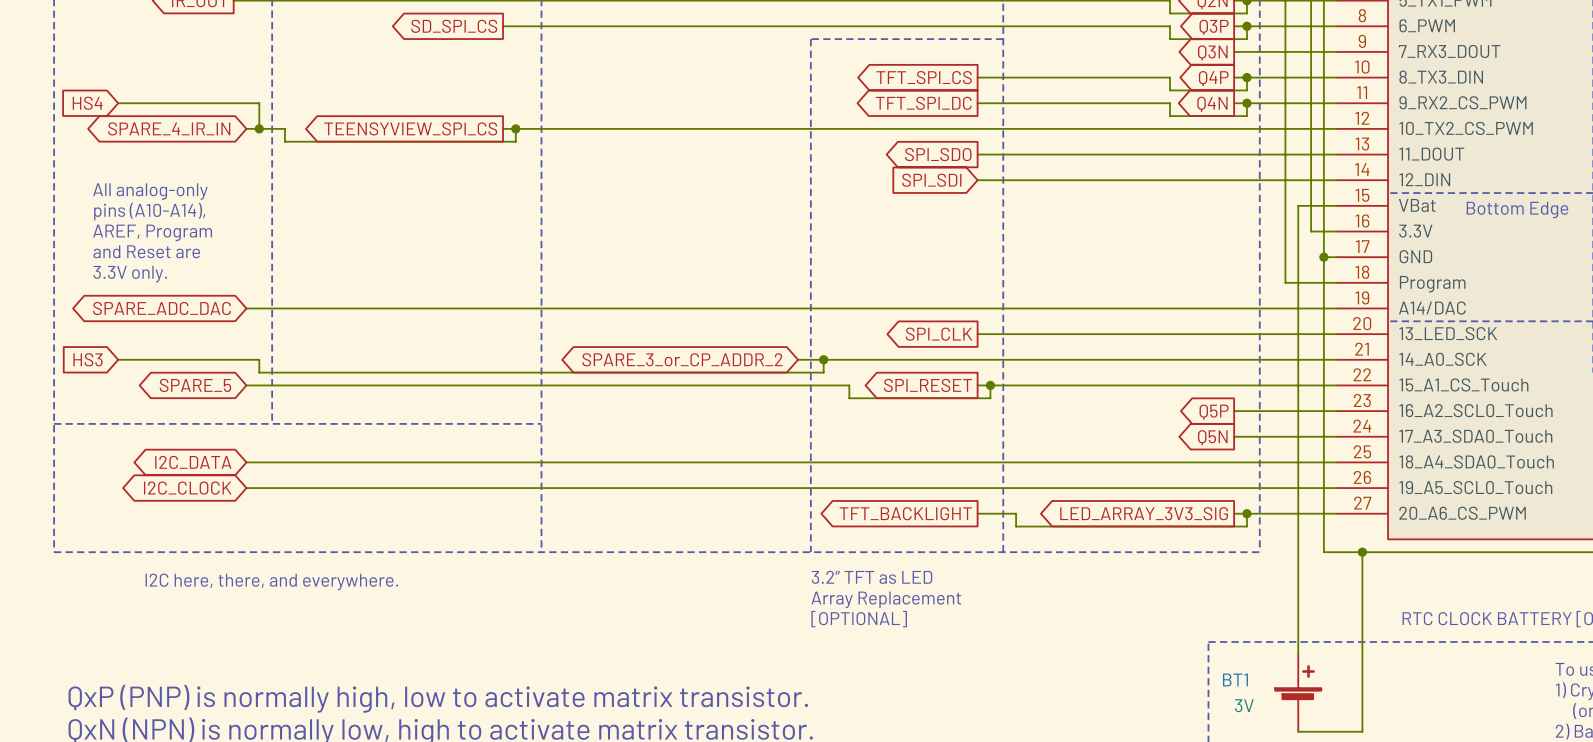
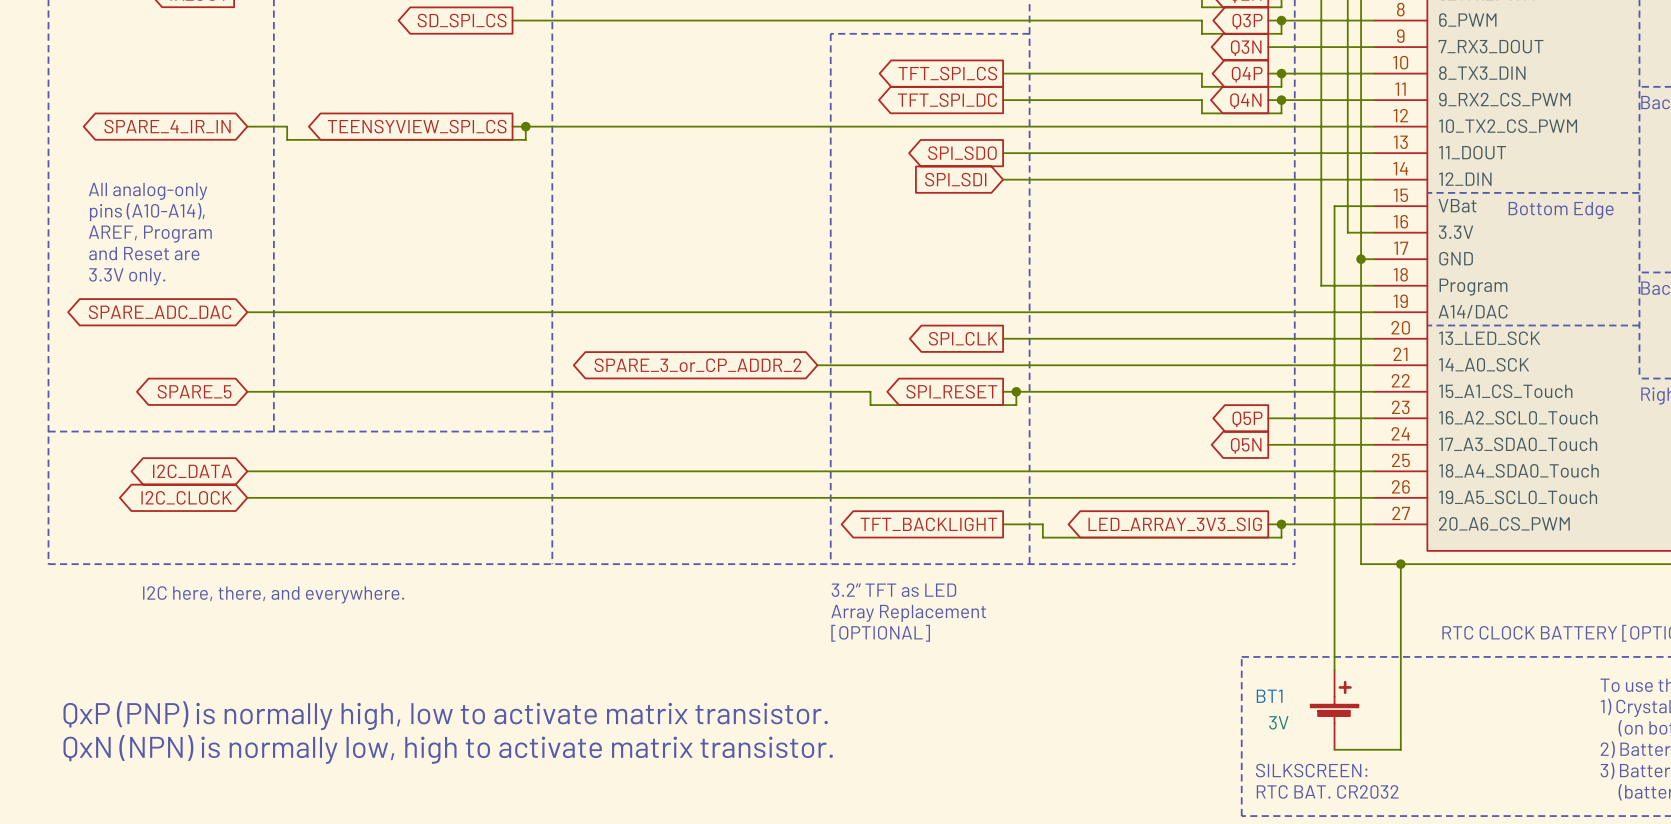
global label: HS4 (87, 103) -> none
wire: (118, 103) (259, 103) (259, 128) -> none
junction: (259, 128) -> none
global label: HS3 (87, 359) -> none
wire: (118, 359) (259, 359) (259, 372) (823, 372) (823, 359) -> none
junction: (823, 359) -> none

